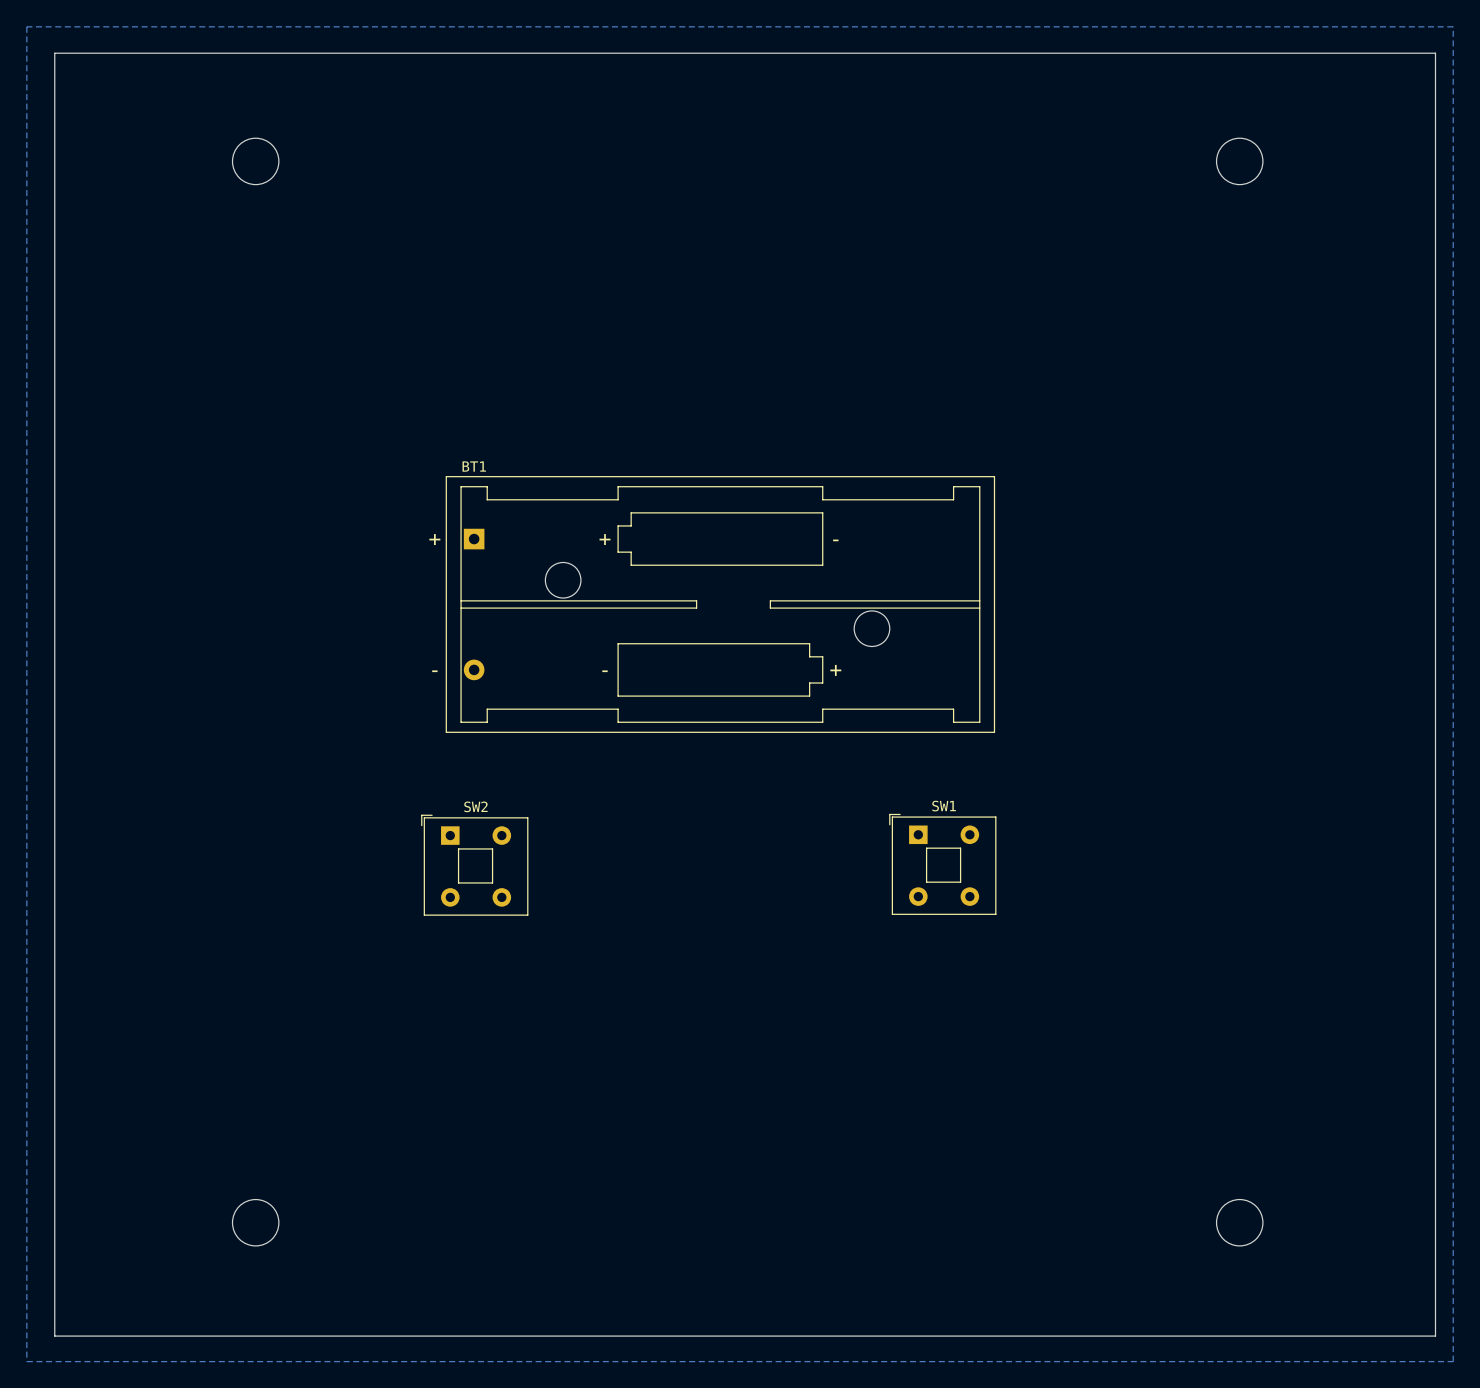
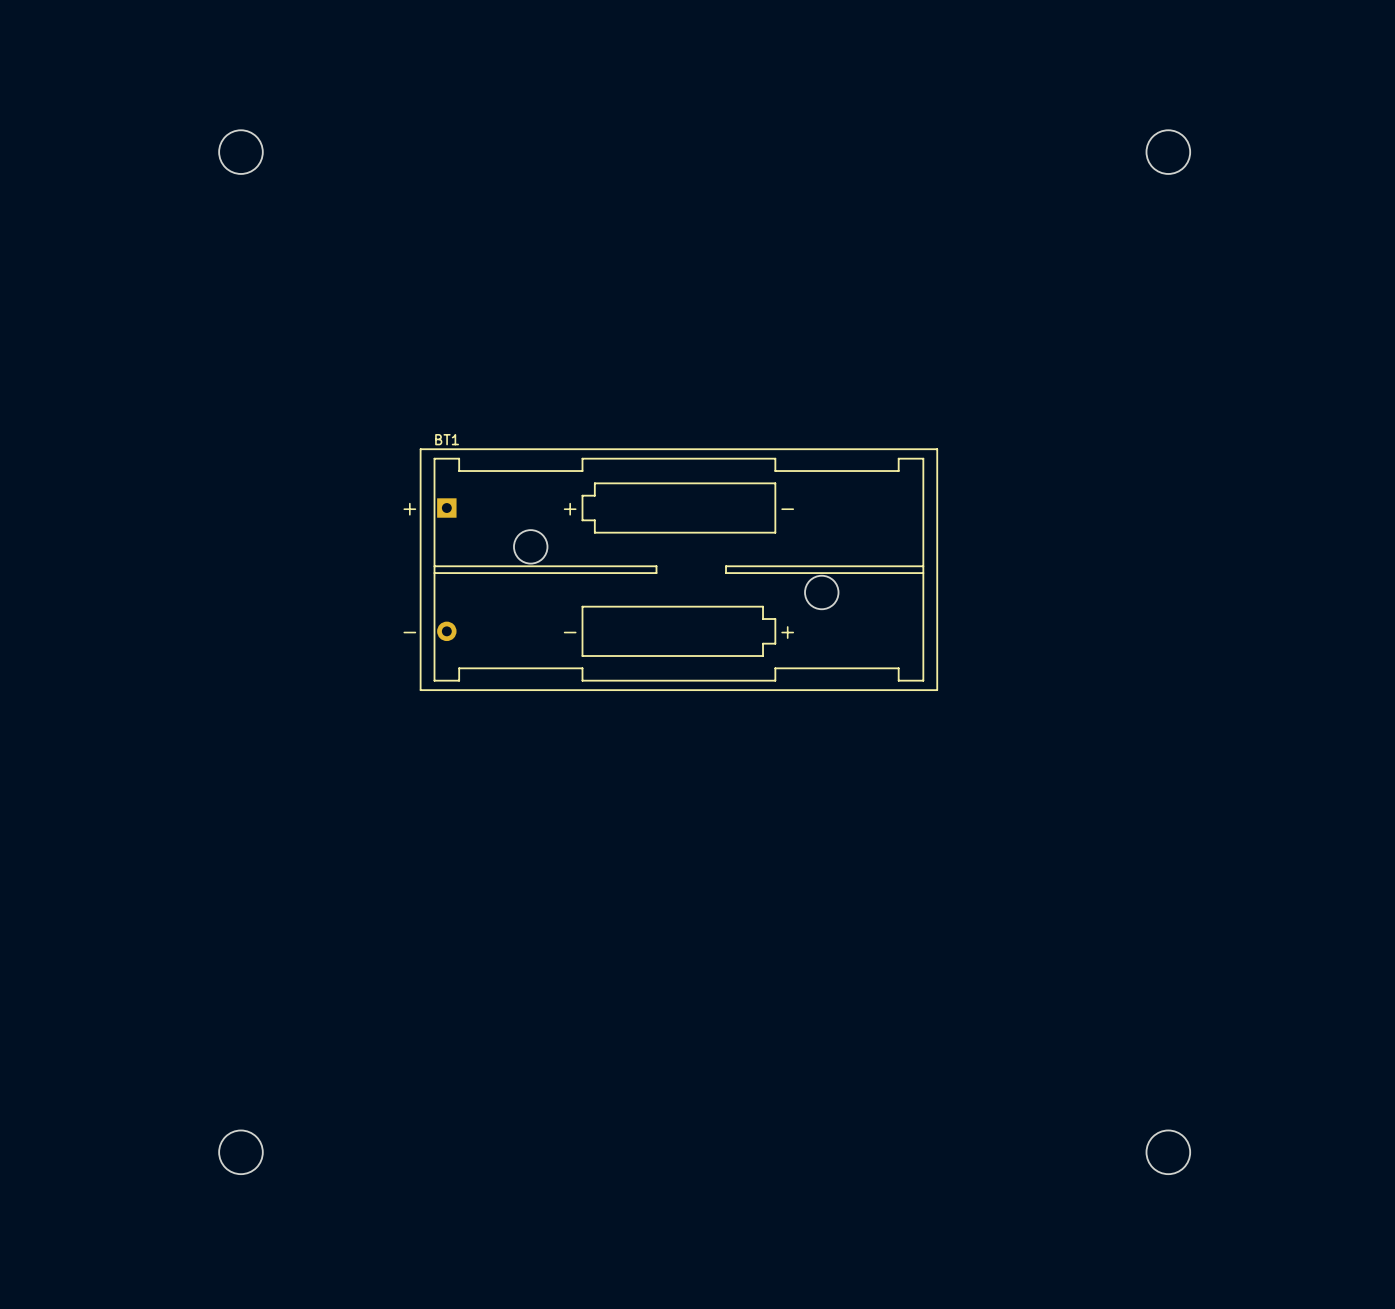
zone outline: (1453, 26) (26, 26) (26, 1361) (1453, 1361) (1453, 26) -> none
board edge: (1435, 53) (54, 53) (54, 1336) (1435, 1336) (1435, 53) -> none
SW1: (942, 864) -> none
SW2: (474, 865) -> none

